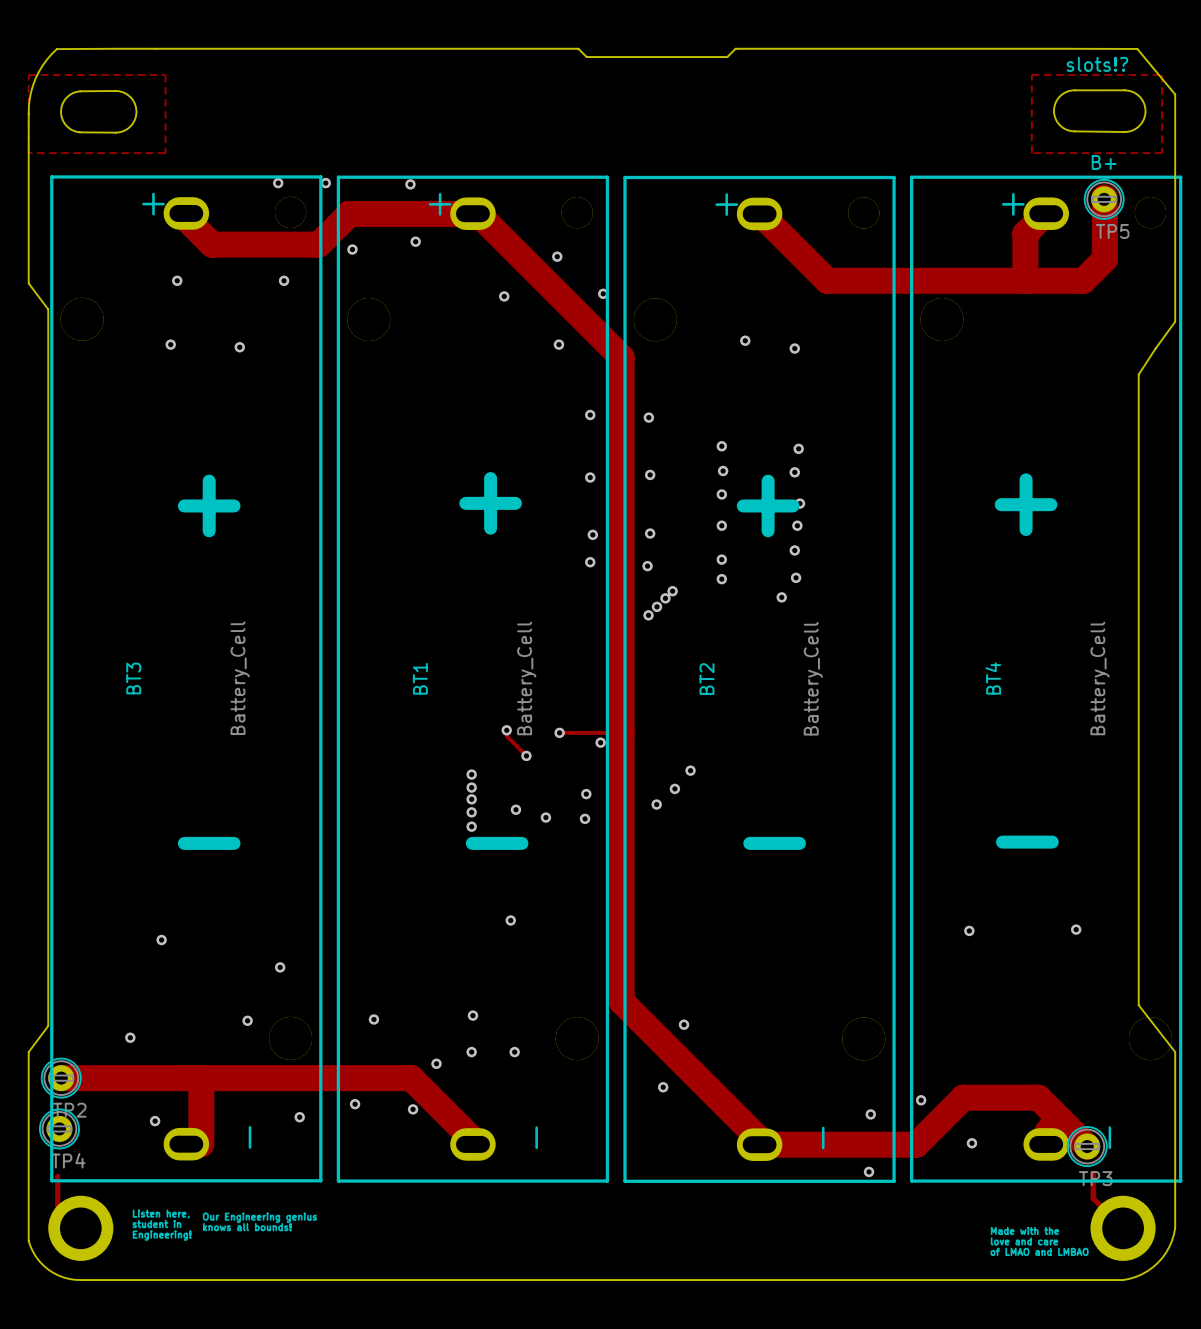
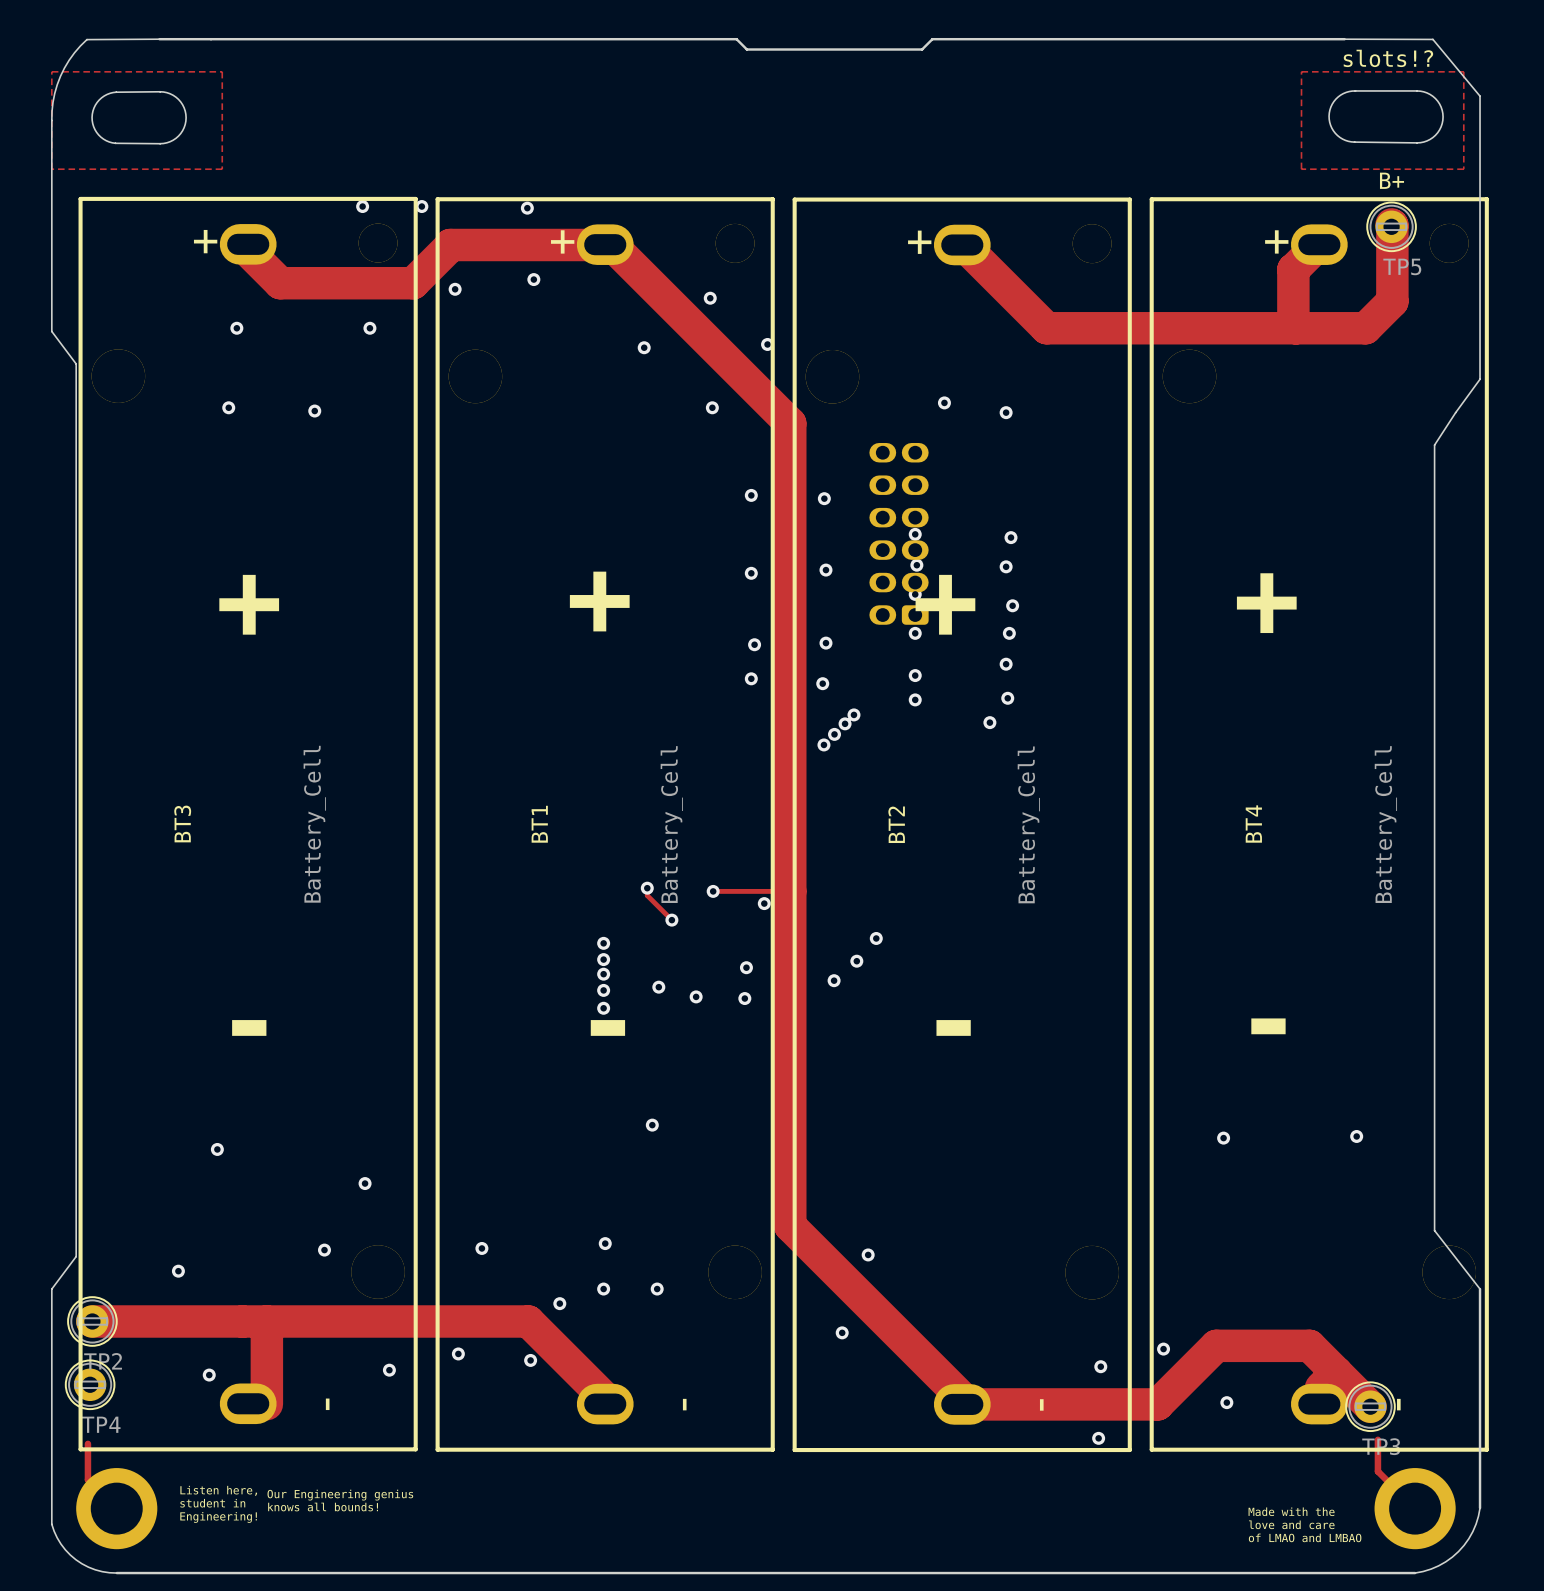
part: none -> (899, 533)

